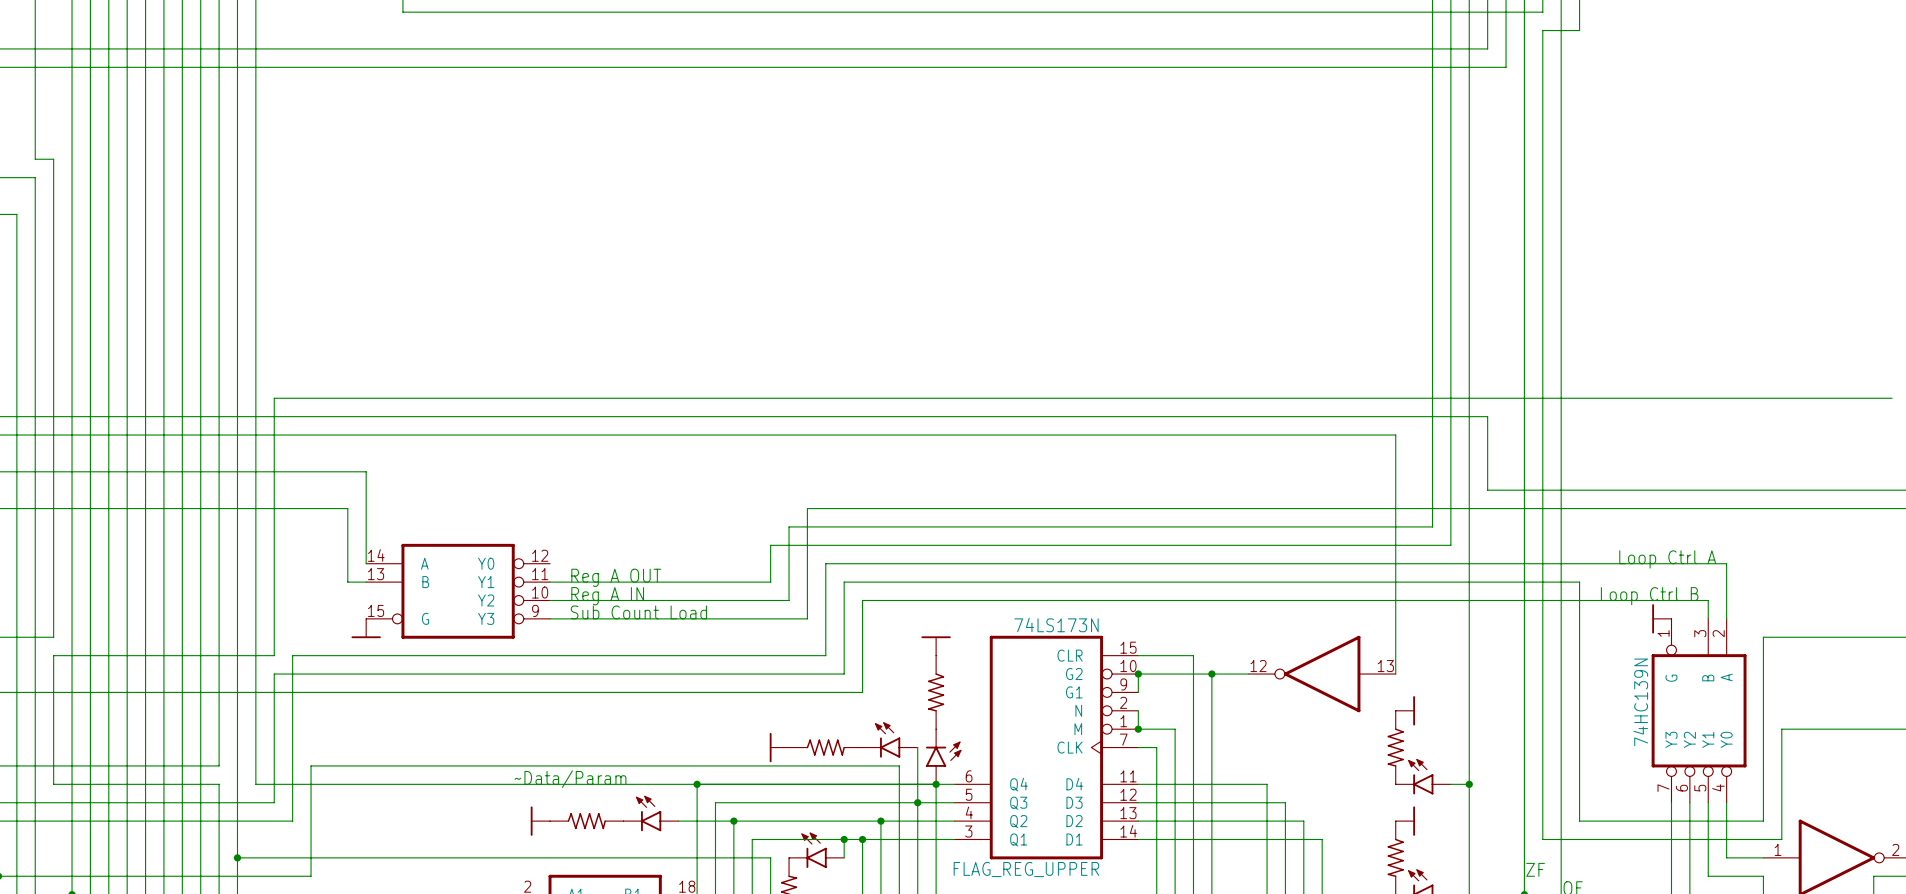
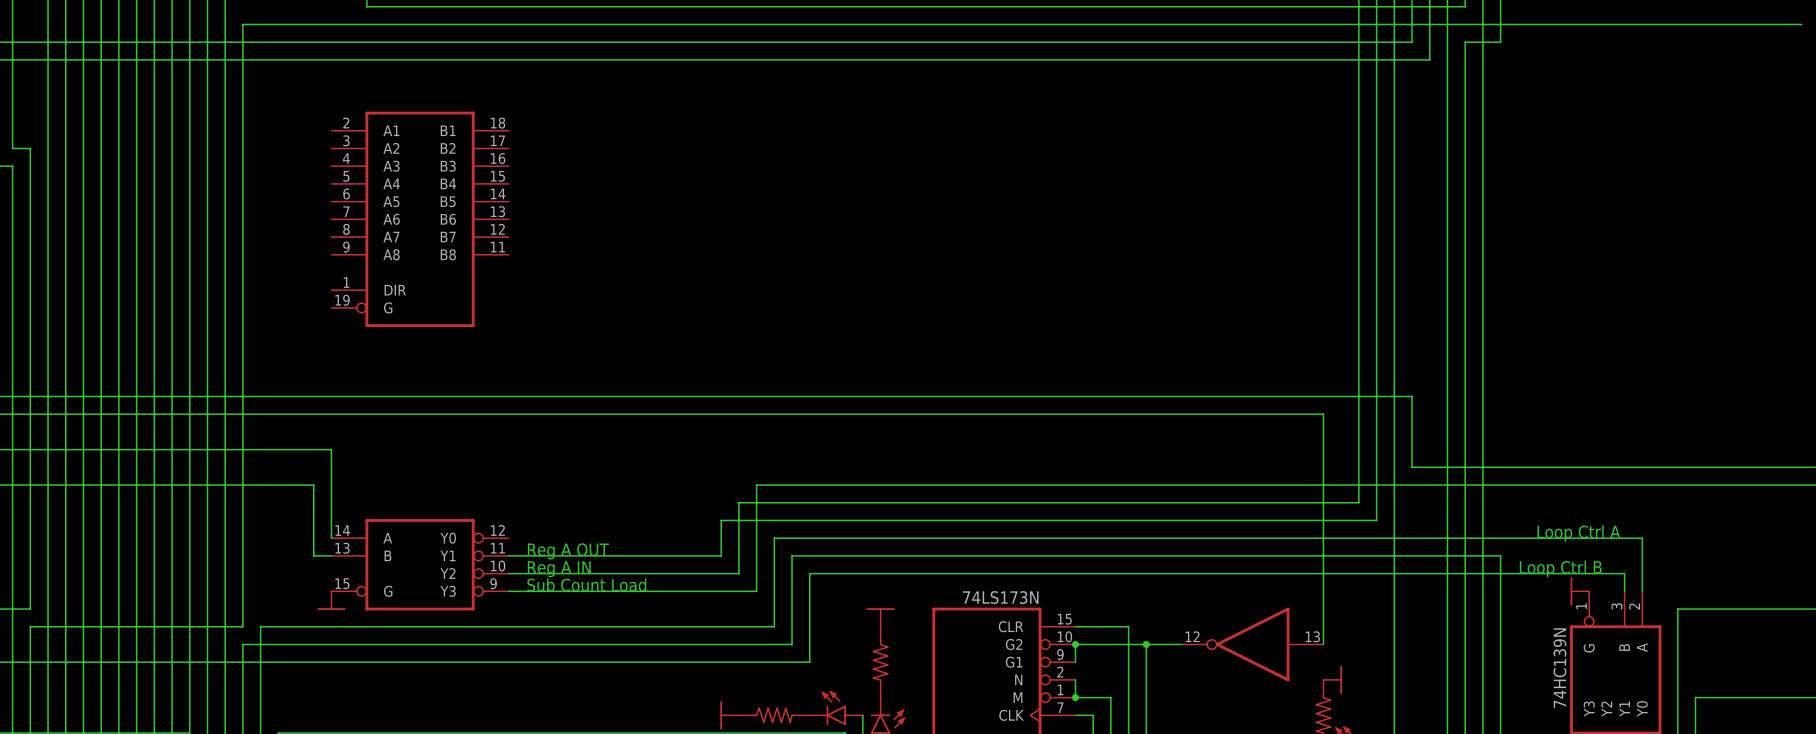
wire: (1542, 30) (1542, 48) -> (1801, 24) (1500, 24) (1500, 42) (1465, 42)
part: none -> (420, 219)
wire: (274, 398) (1892, 398) -> (242, 378) (242, 24) (1465, 24)

